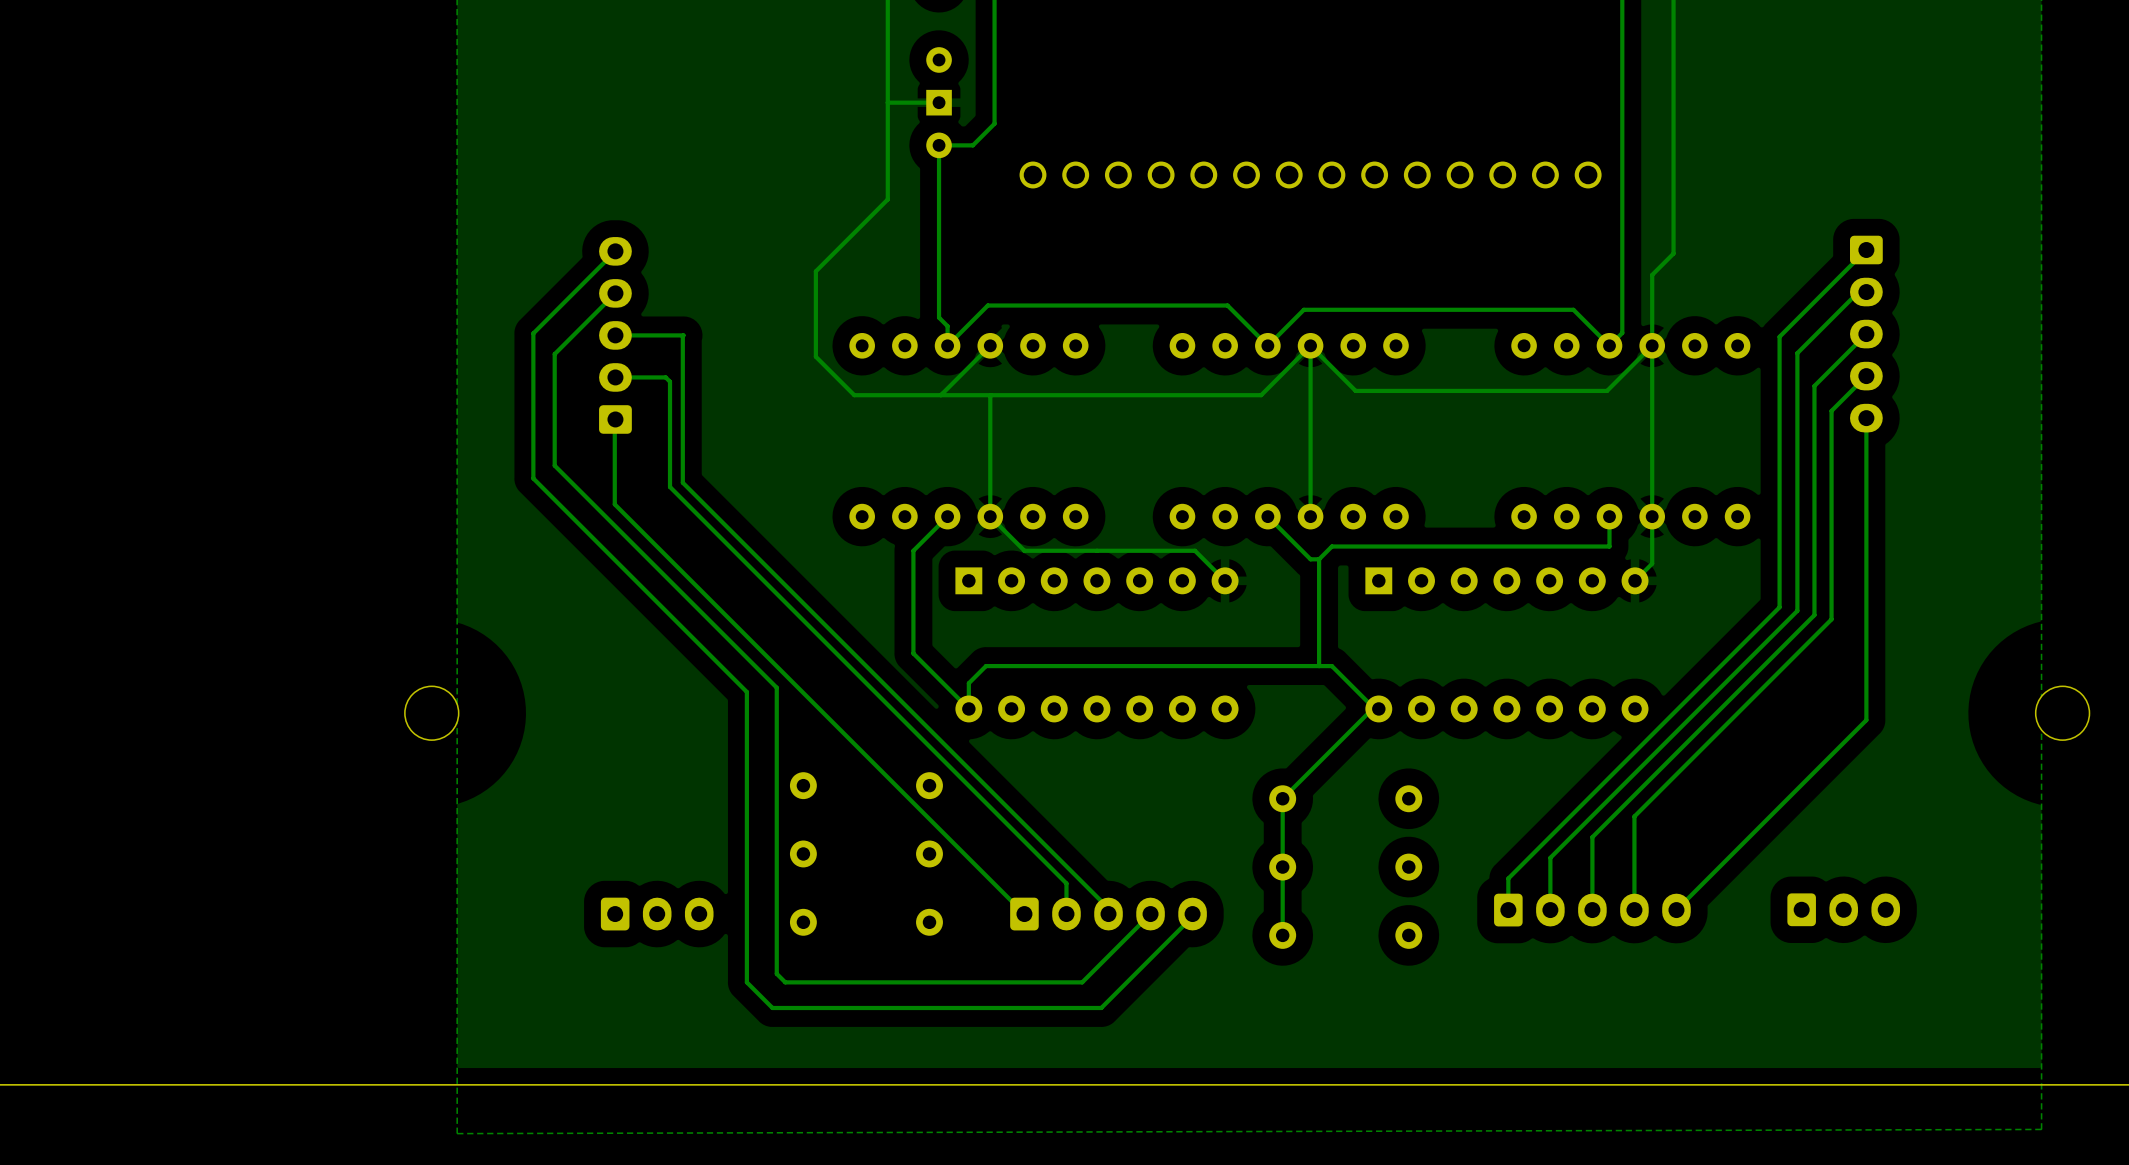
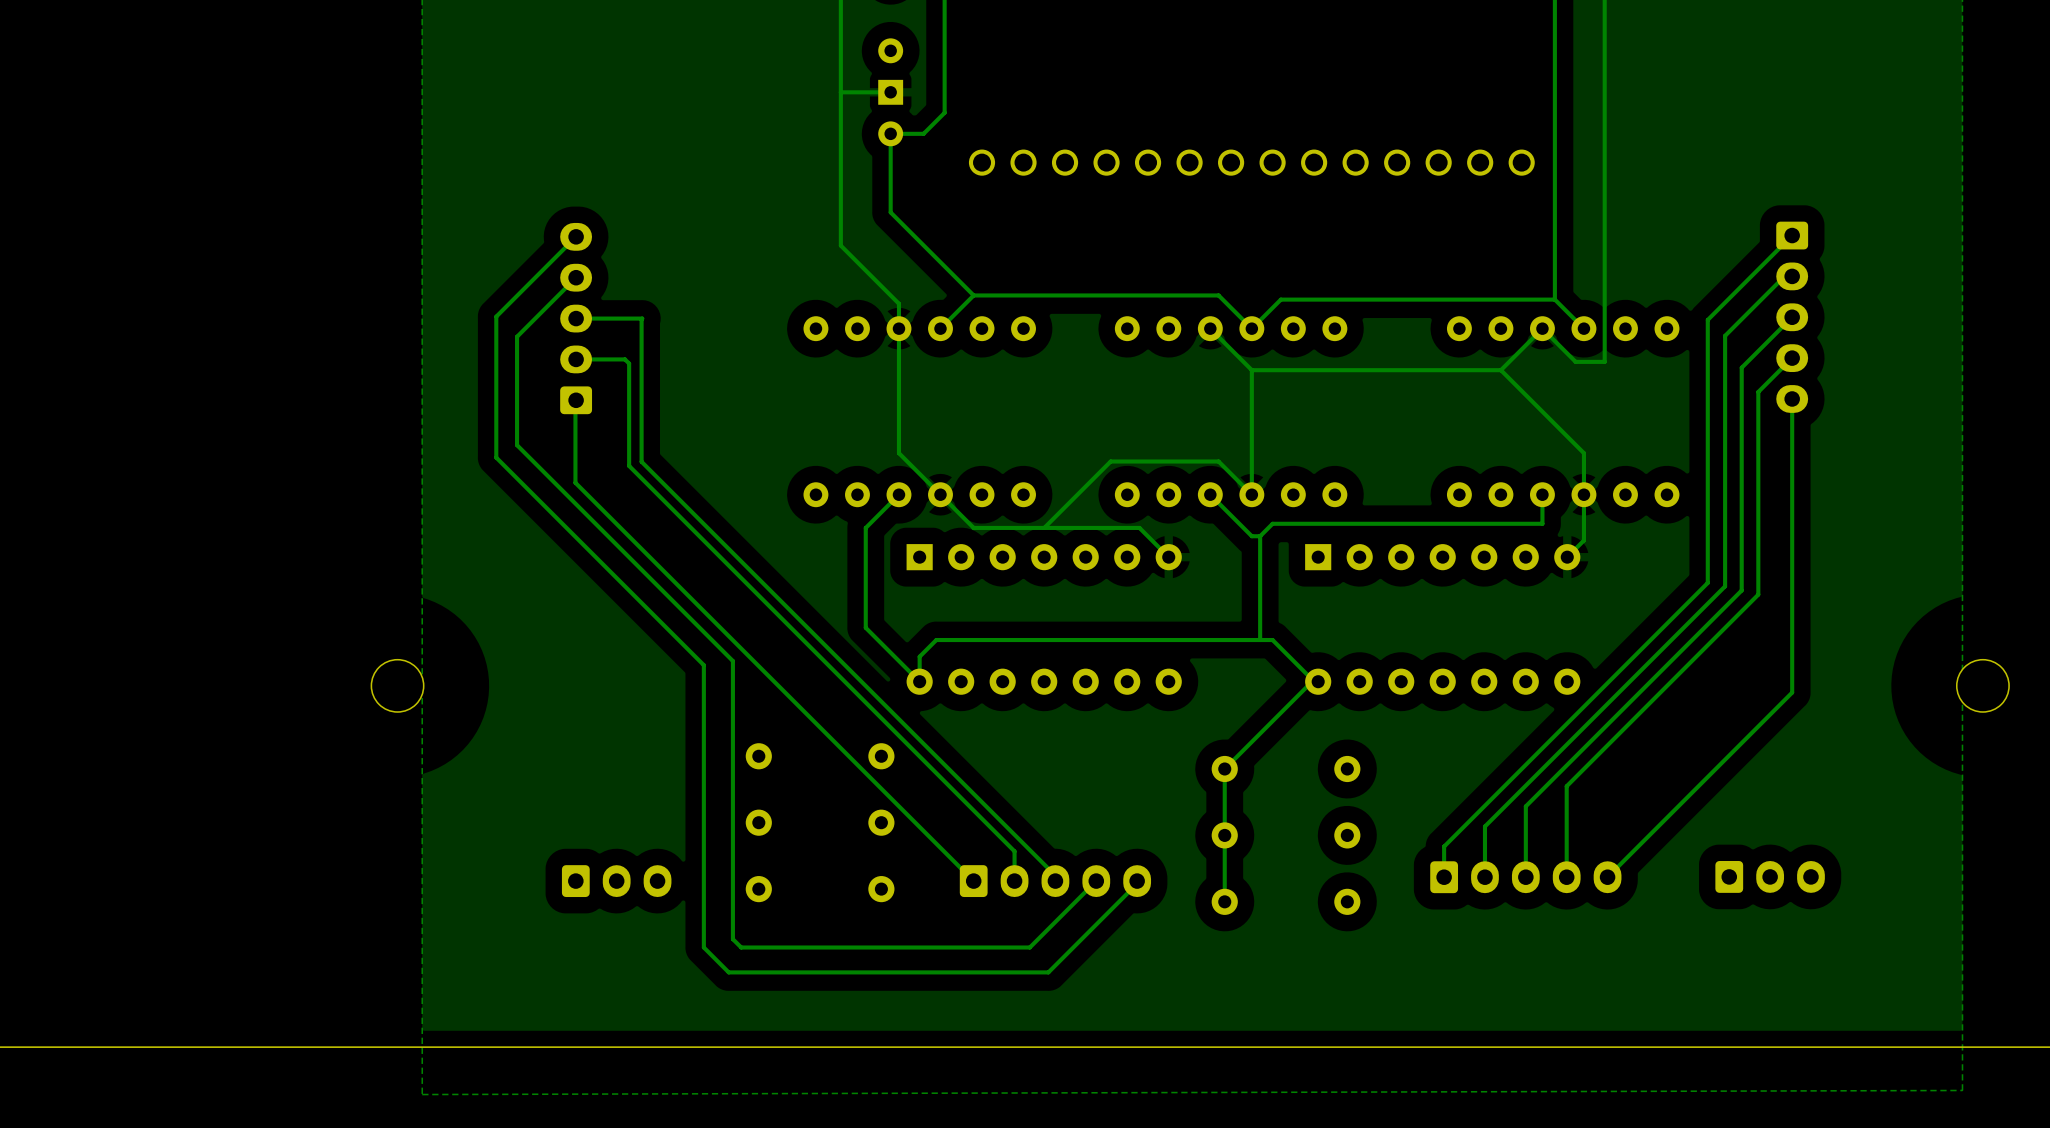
track: (887, 199) (815, 271) (815, 356) (854, 395) (1261, 395) (1310, 345) -> none
track: (939, 226) (939, 317) (947, 326) -> (840, 186) (840, 245) (898, 303) (898, 309)
track: none -> (890, 212) (973, 295)
track: (1673, 253) (1652, 274) (1652, 473) -> (1604, 239) (1604, 361) (1575, 361) (1542, 328) (1500, 370)
track: (1622, 315) (1622, 332) (1609, 345) (1573, 309) (1303, 309) (1267, 345) (1227, 305) (987, 305) (947, 345) -> none
track: (990, 345) (940, 395) -> (940, 328) (973, 295)
track: none -> (1210, 328) (1251, 370) (1500, 370)
track: (1310, 345) (1310, 388) -> none
track: (1652, 345) (1607, 390) (1355, 390) (1310, 345) -> (1583, 328) (1554, 299) (1280, 299) (1251, 328) (1218, 295) (973, 295)
track: none -> (1500, 370) (1583, 453)
track: (990, 395) (990, 516) -> (898, 328) (898, 453) (940, 494)
track: none -> (1251, 494) (1218, 461) (1110, 461) (1044, 527)

